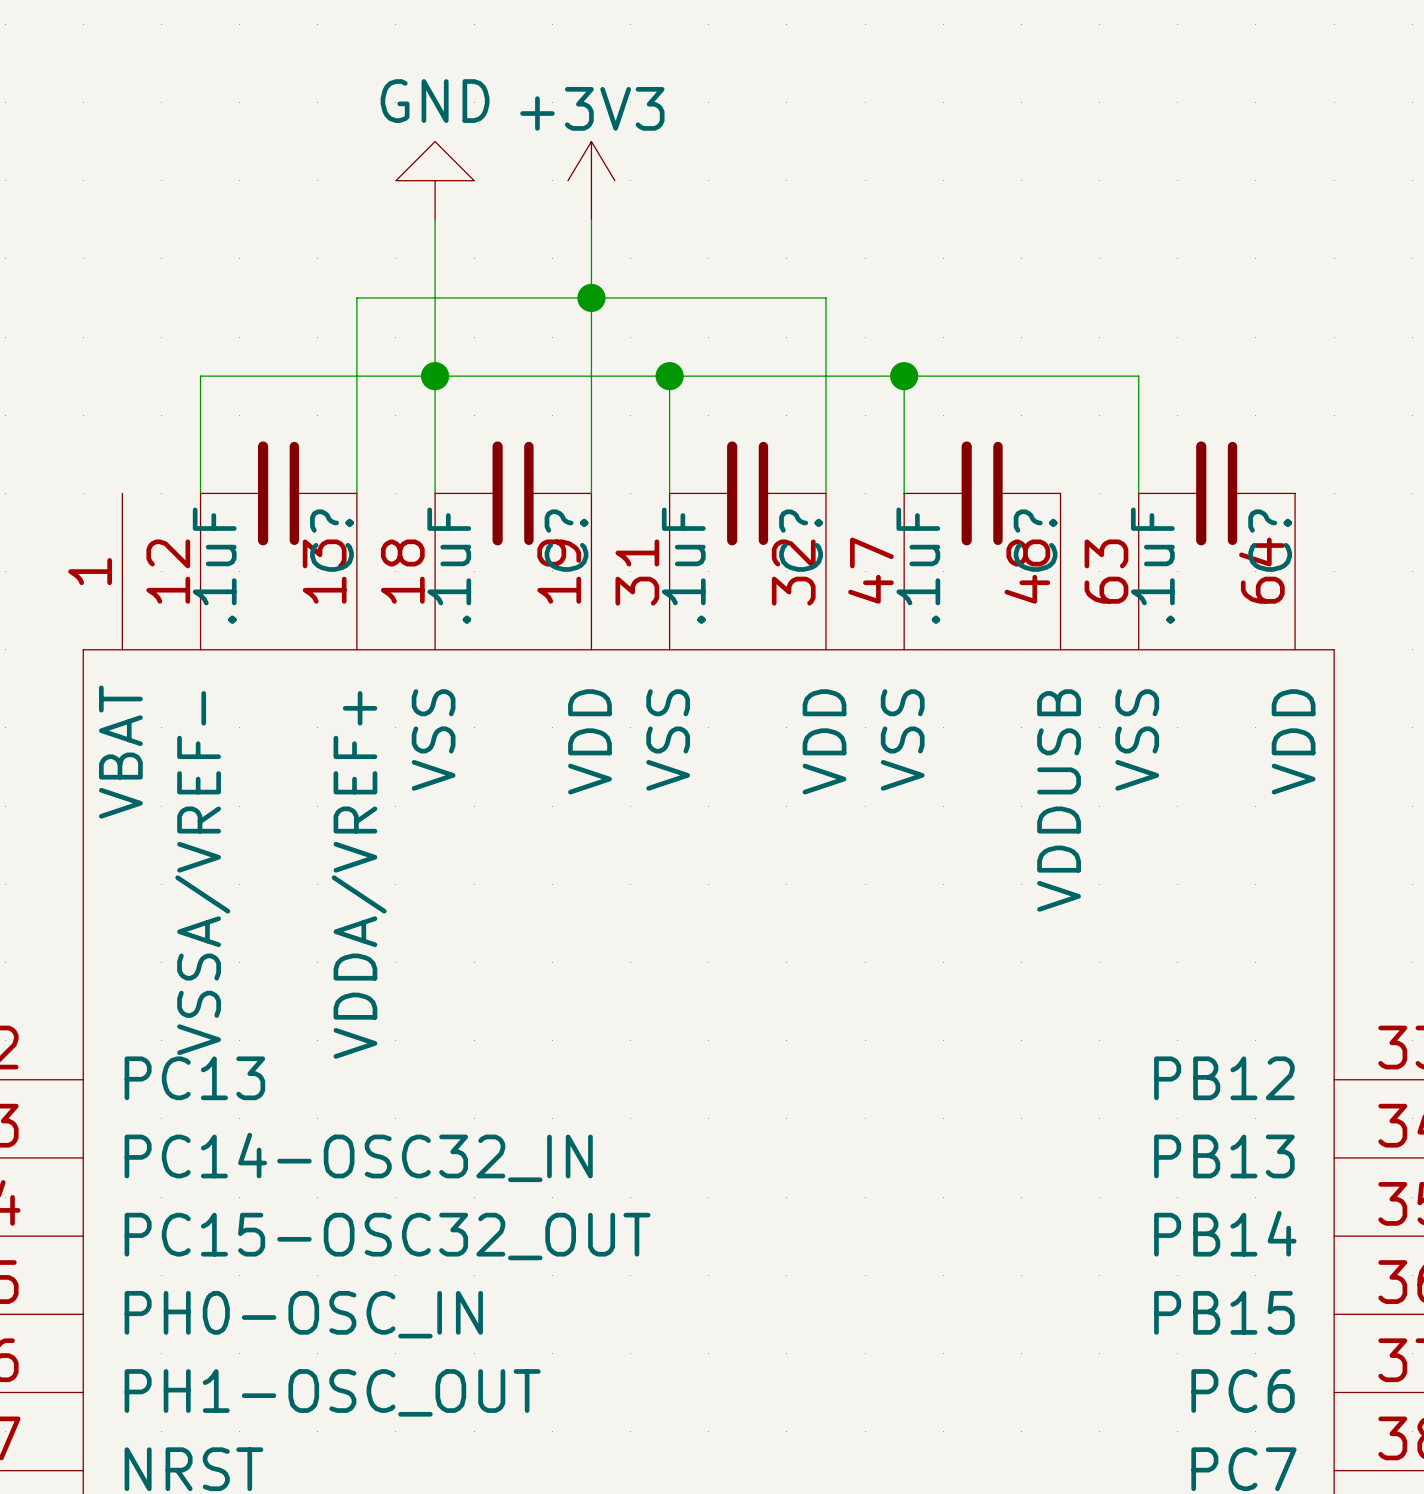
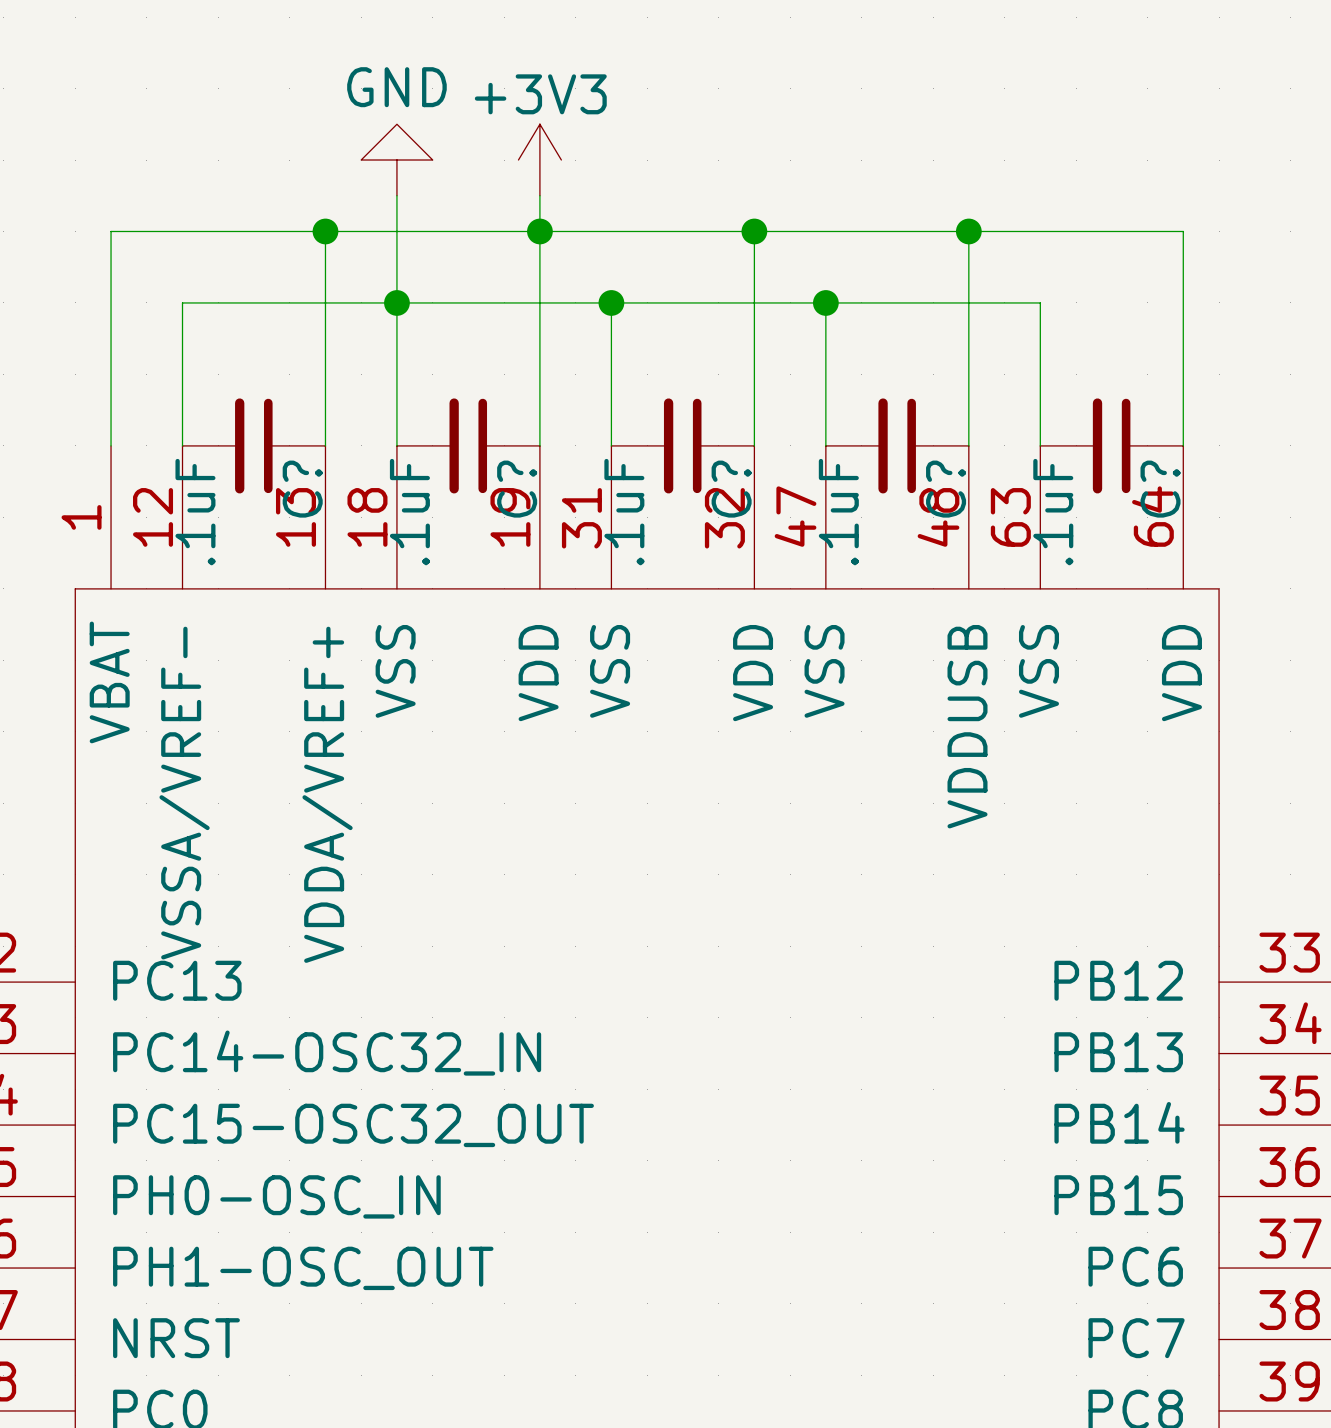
junction: none -> (325, 231)
wire: none -> (754, 231) (754, 267)
junction: none -> (754, 231)
wire: none -> (968, 231) (968, 445)
junction: none -> (968, 231)
wire: (356, 297) (825, 297) -> (325, 267) (325, 231)
junction position: (591, 297) -> (539, 231)
wire: none -> (611, 302) (611, 338)
wire: none -> (825, 302) (825, 338)
wire: (200, 376) (1138, 376) -> (182, 338) (182, 302) (1040, 302) (1040, 338)
junction position: (435, 376) -> (396, 302)
junction position: (669, 376) -> (611, 302)
junction position: (904, 376) -> (825, 302)
wire: none -> (111, 445) (111, 231) (1183, 231) (1183, 445)

